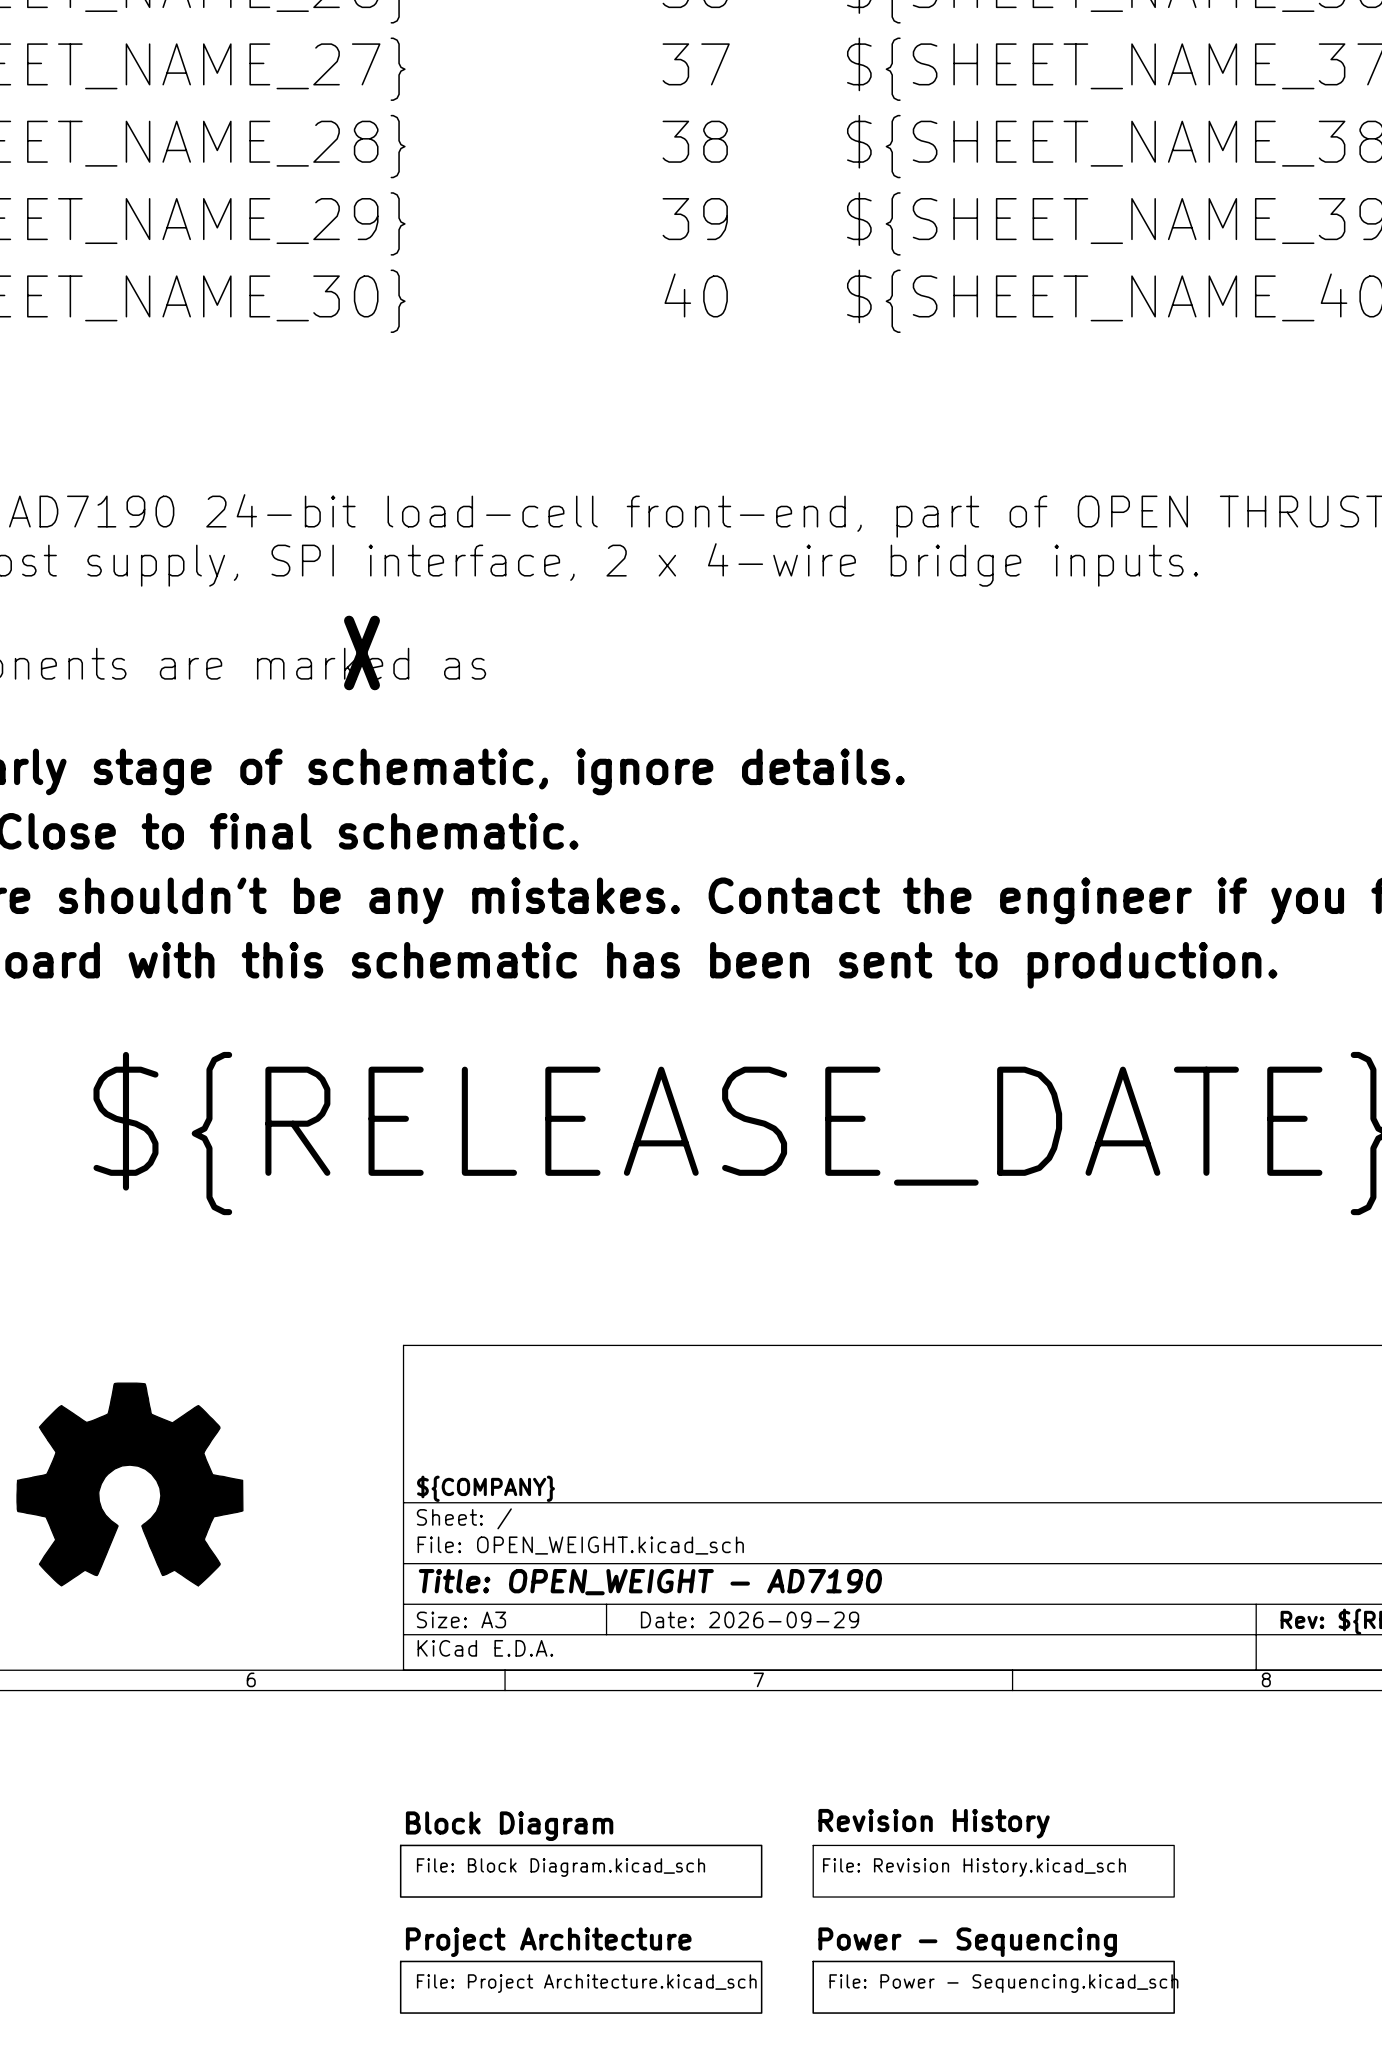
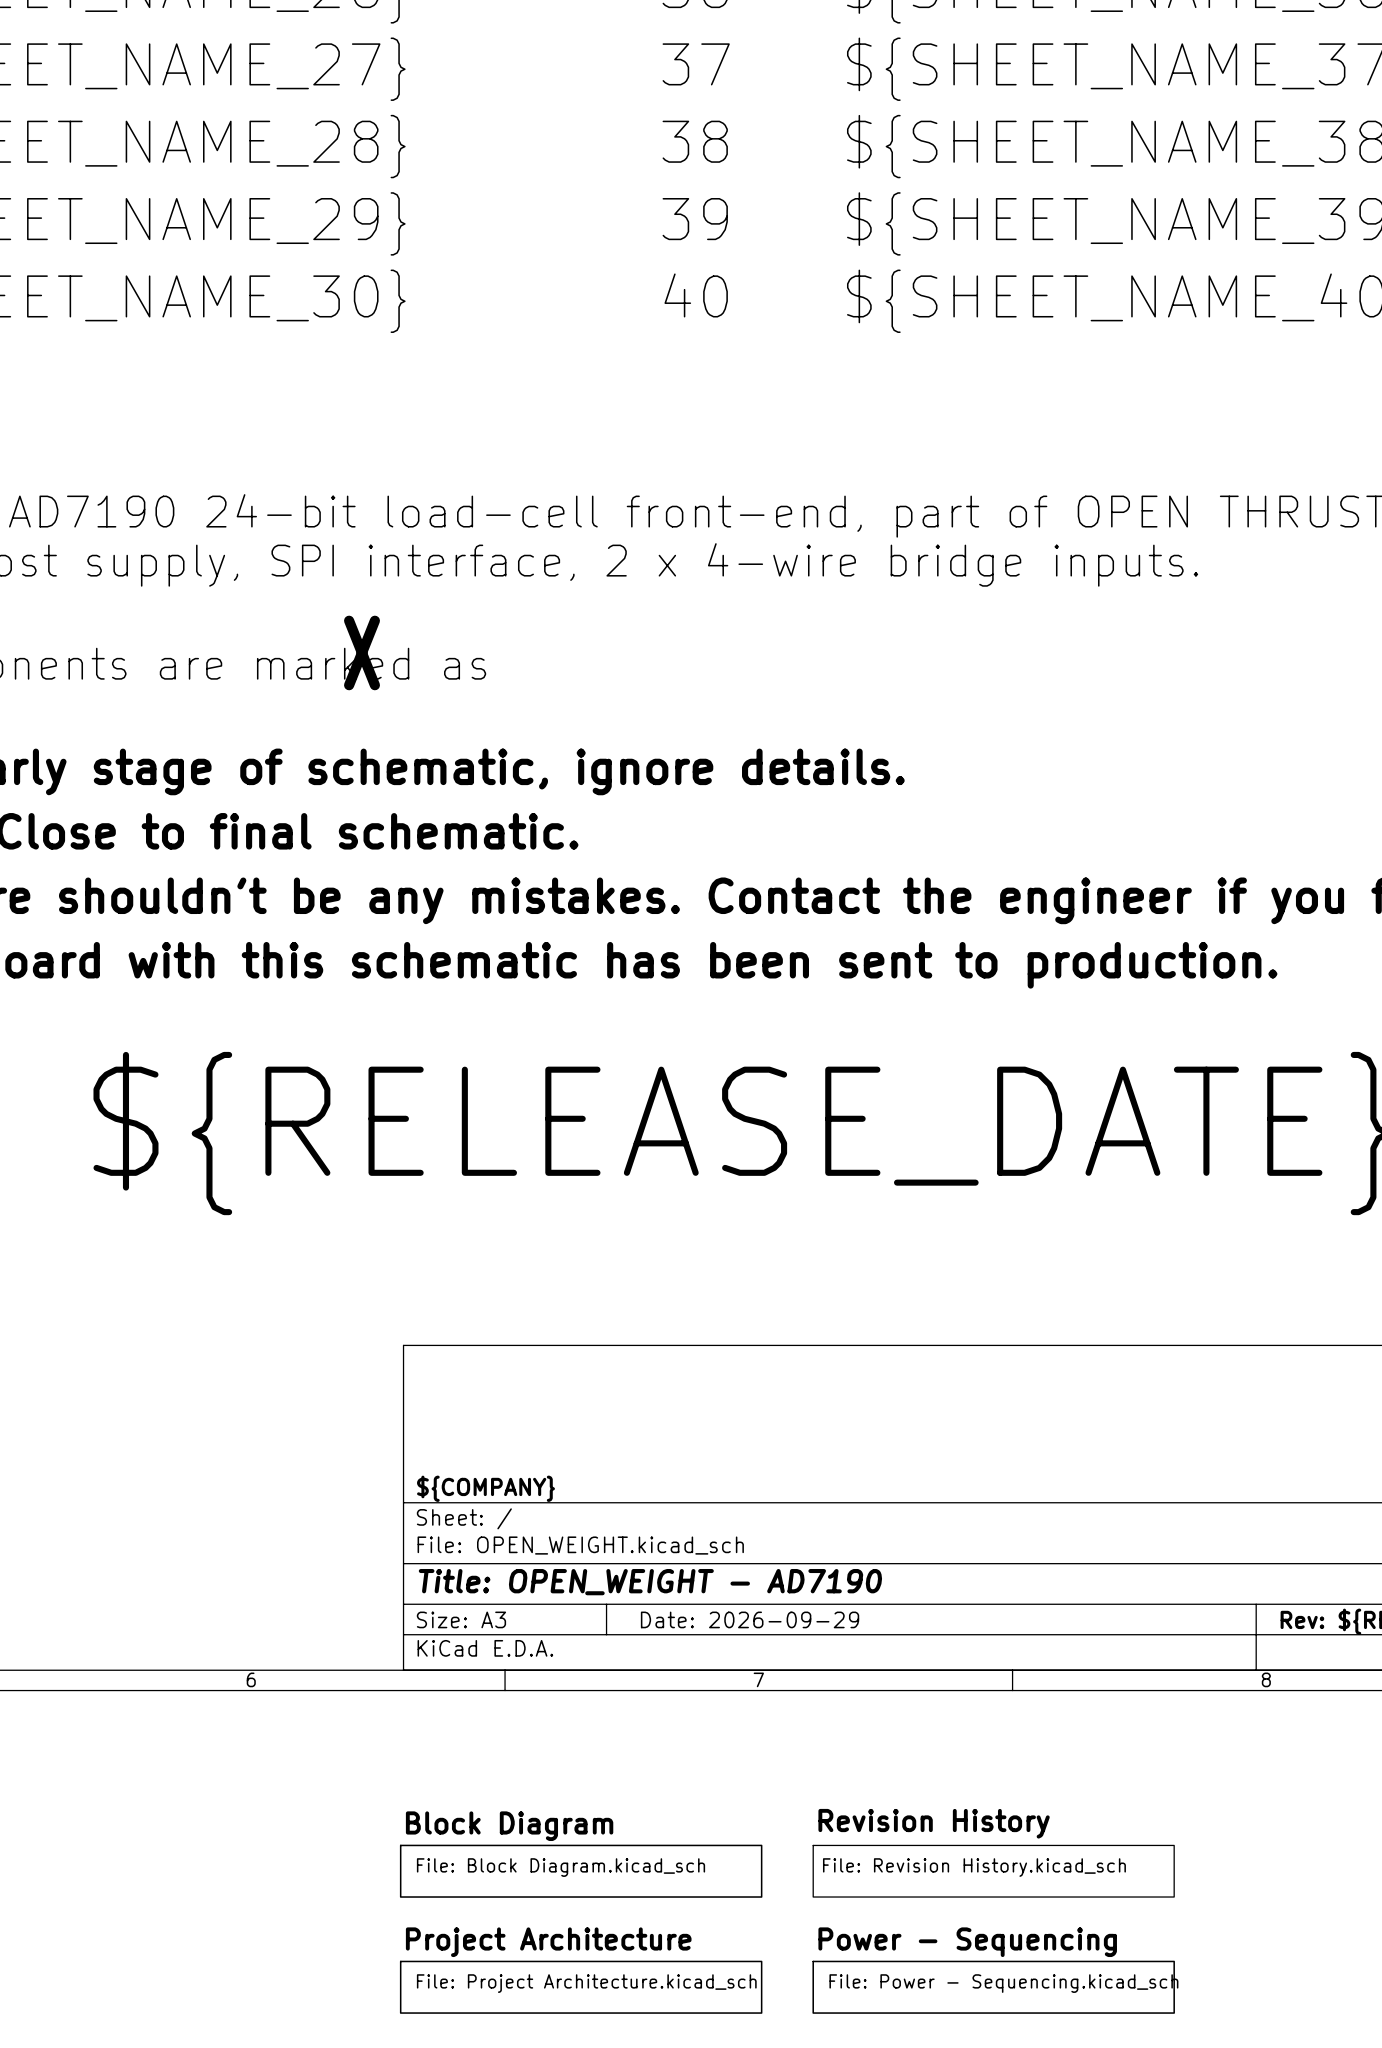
power symbol: (129, 1484) -> none

